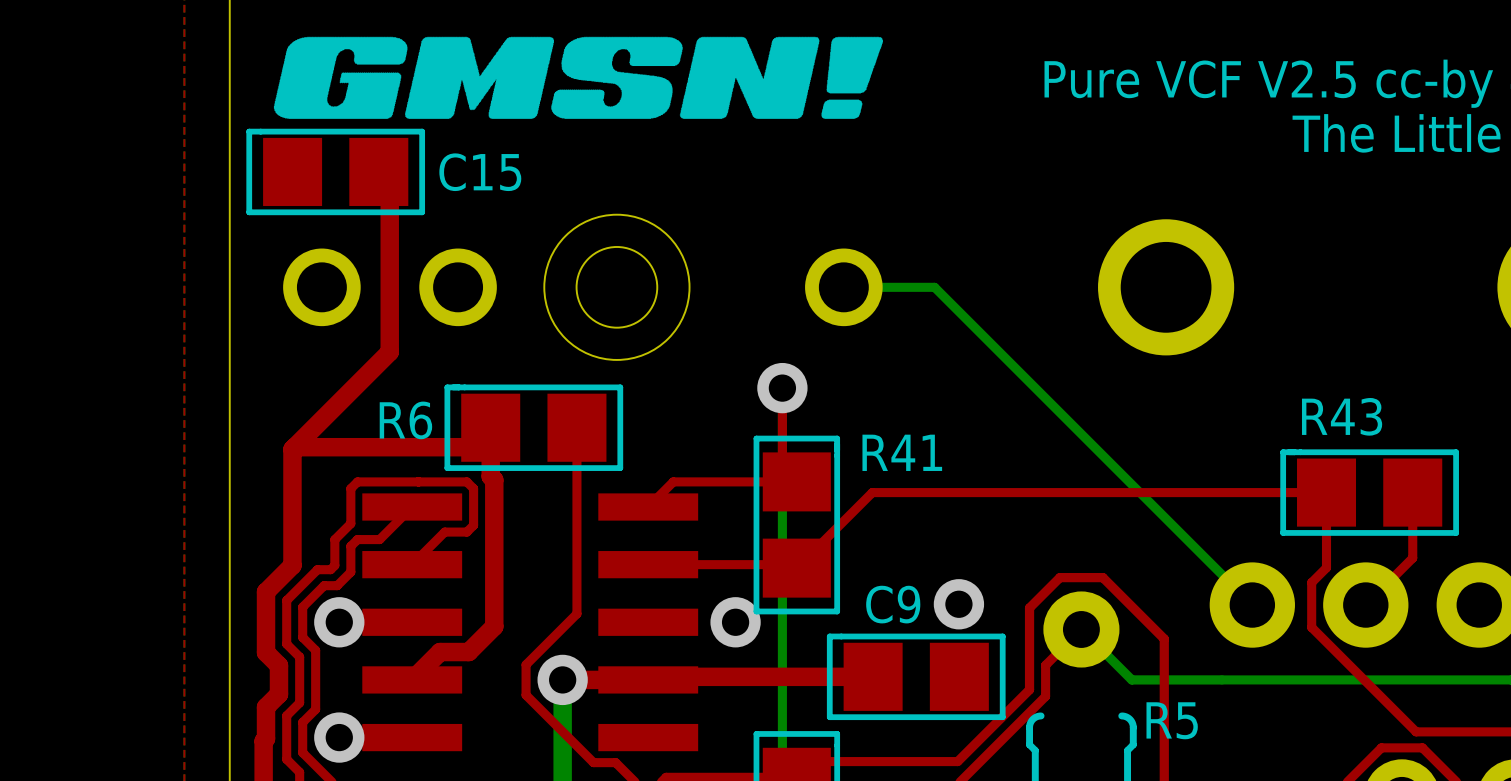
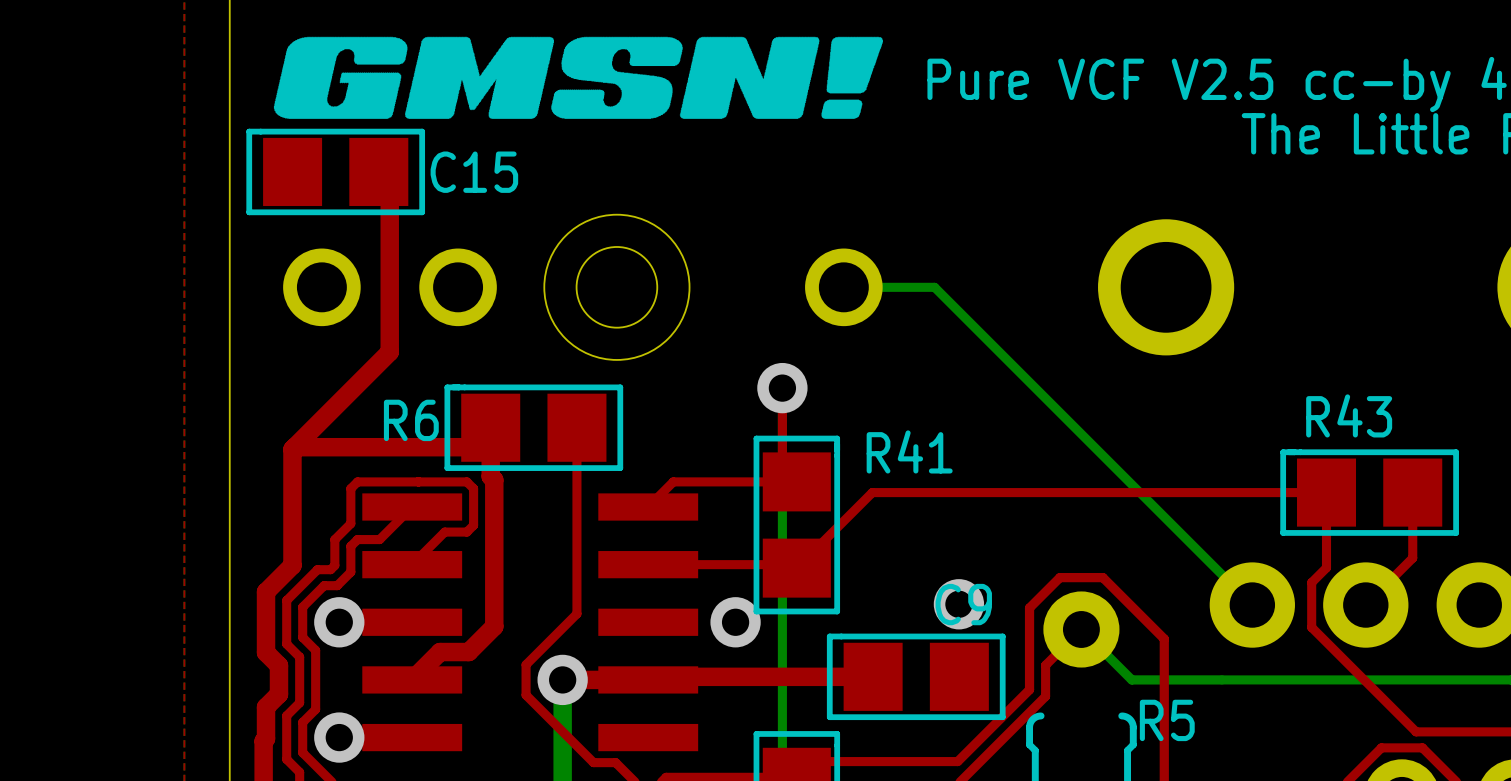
C9 name position: C9 (893, 604) -> C9 (963, 604)

